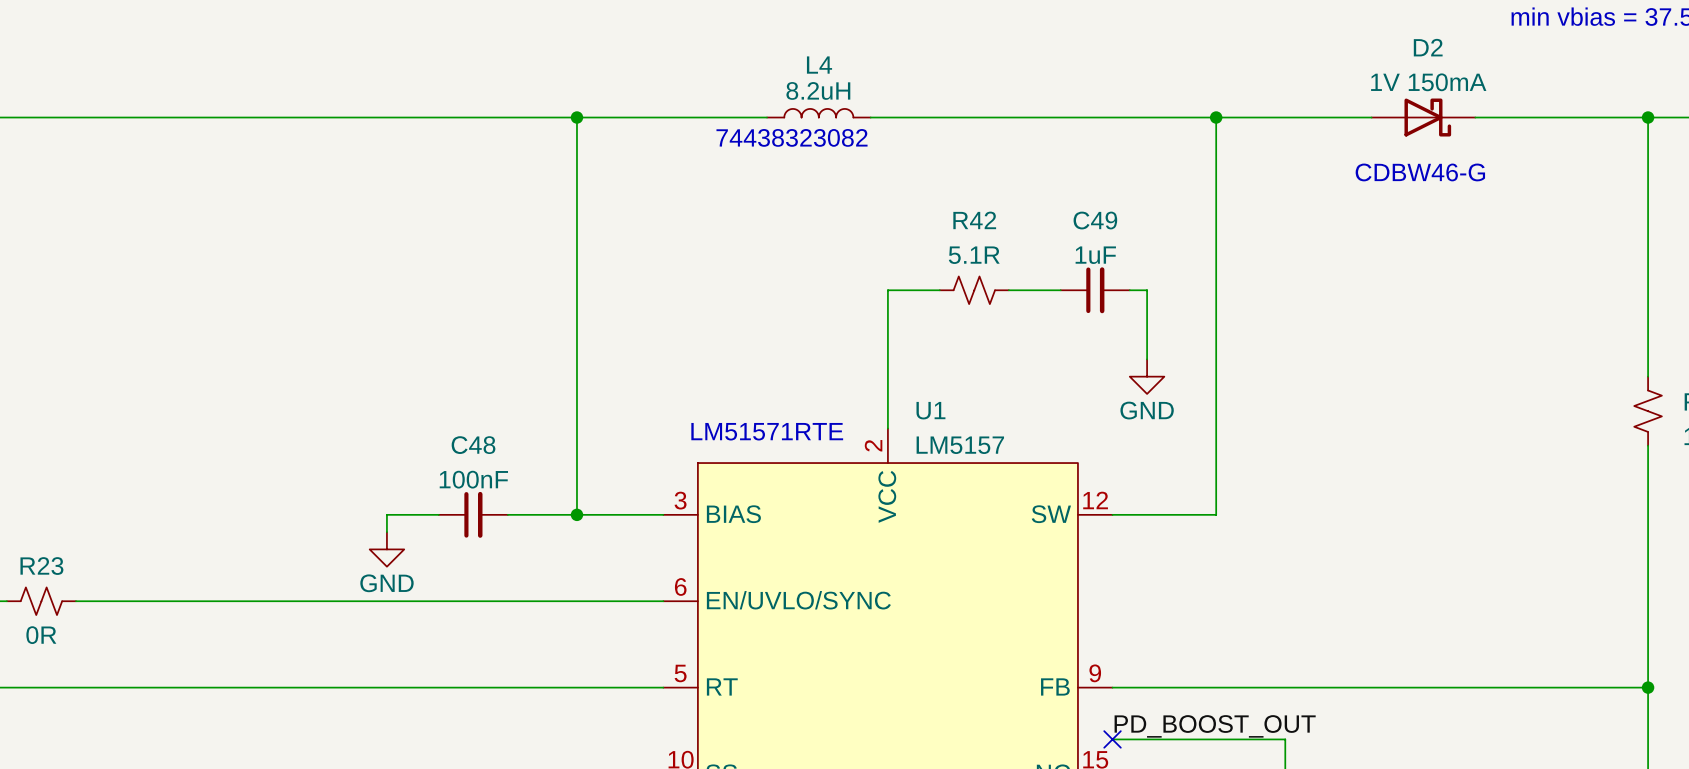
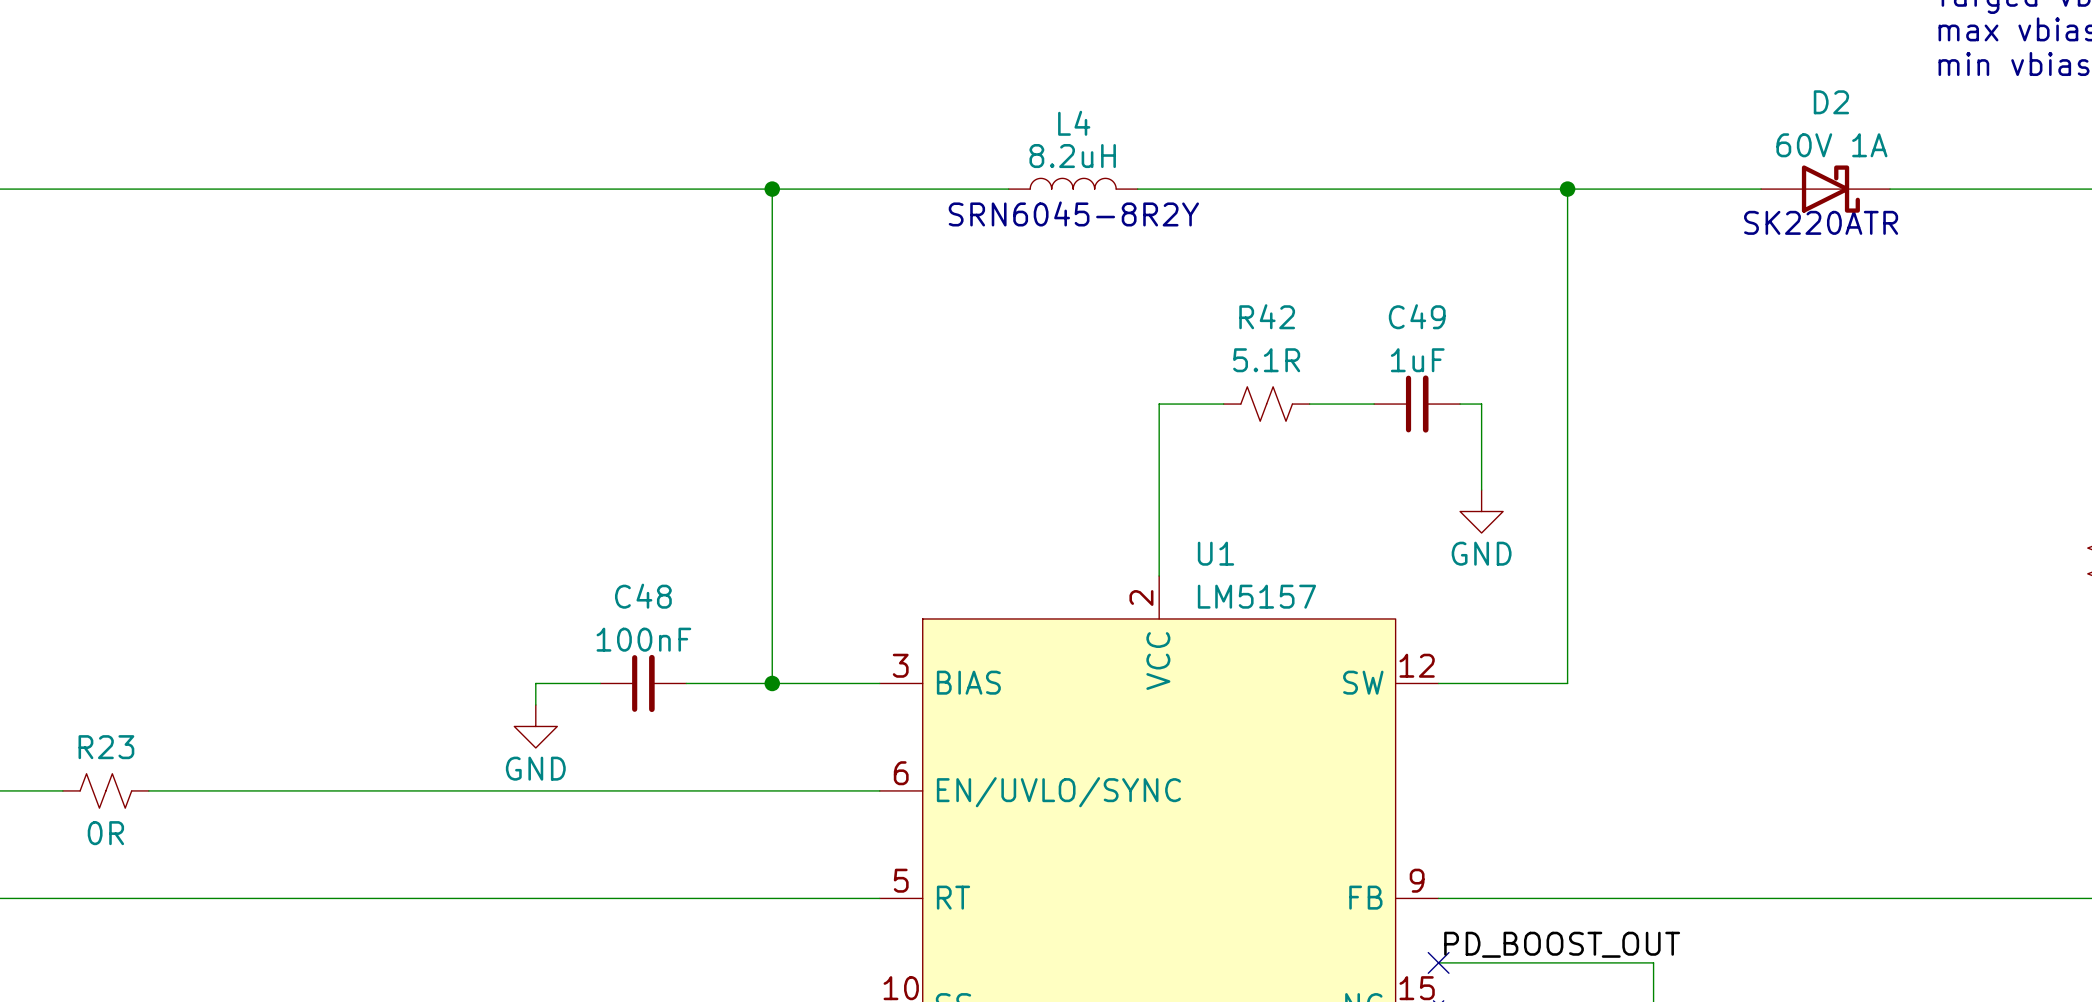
D2 value: 1V 150mA (1428, 82) -> 60V 1A (1831, 145)
text: 74438323082 (792, 137) -> SRN6045-8R2Y (1073, 213)
text: none -> SK220ATR (1821, 222)
text: CDBW46-G (1420, 172) -> none
text: LM51571RTE (767, 431) -> none

